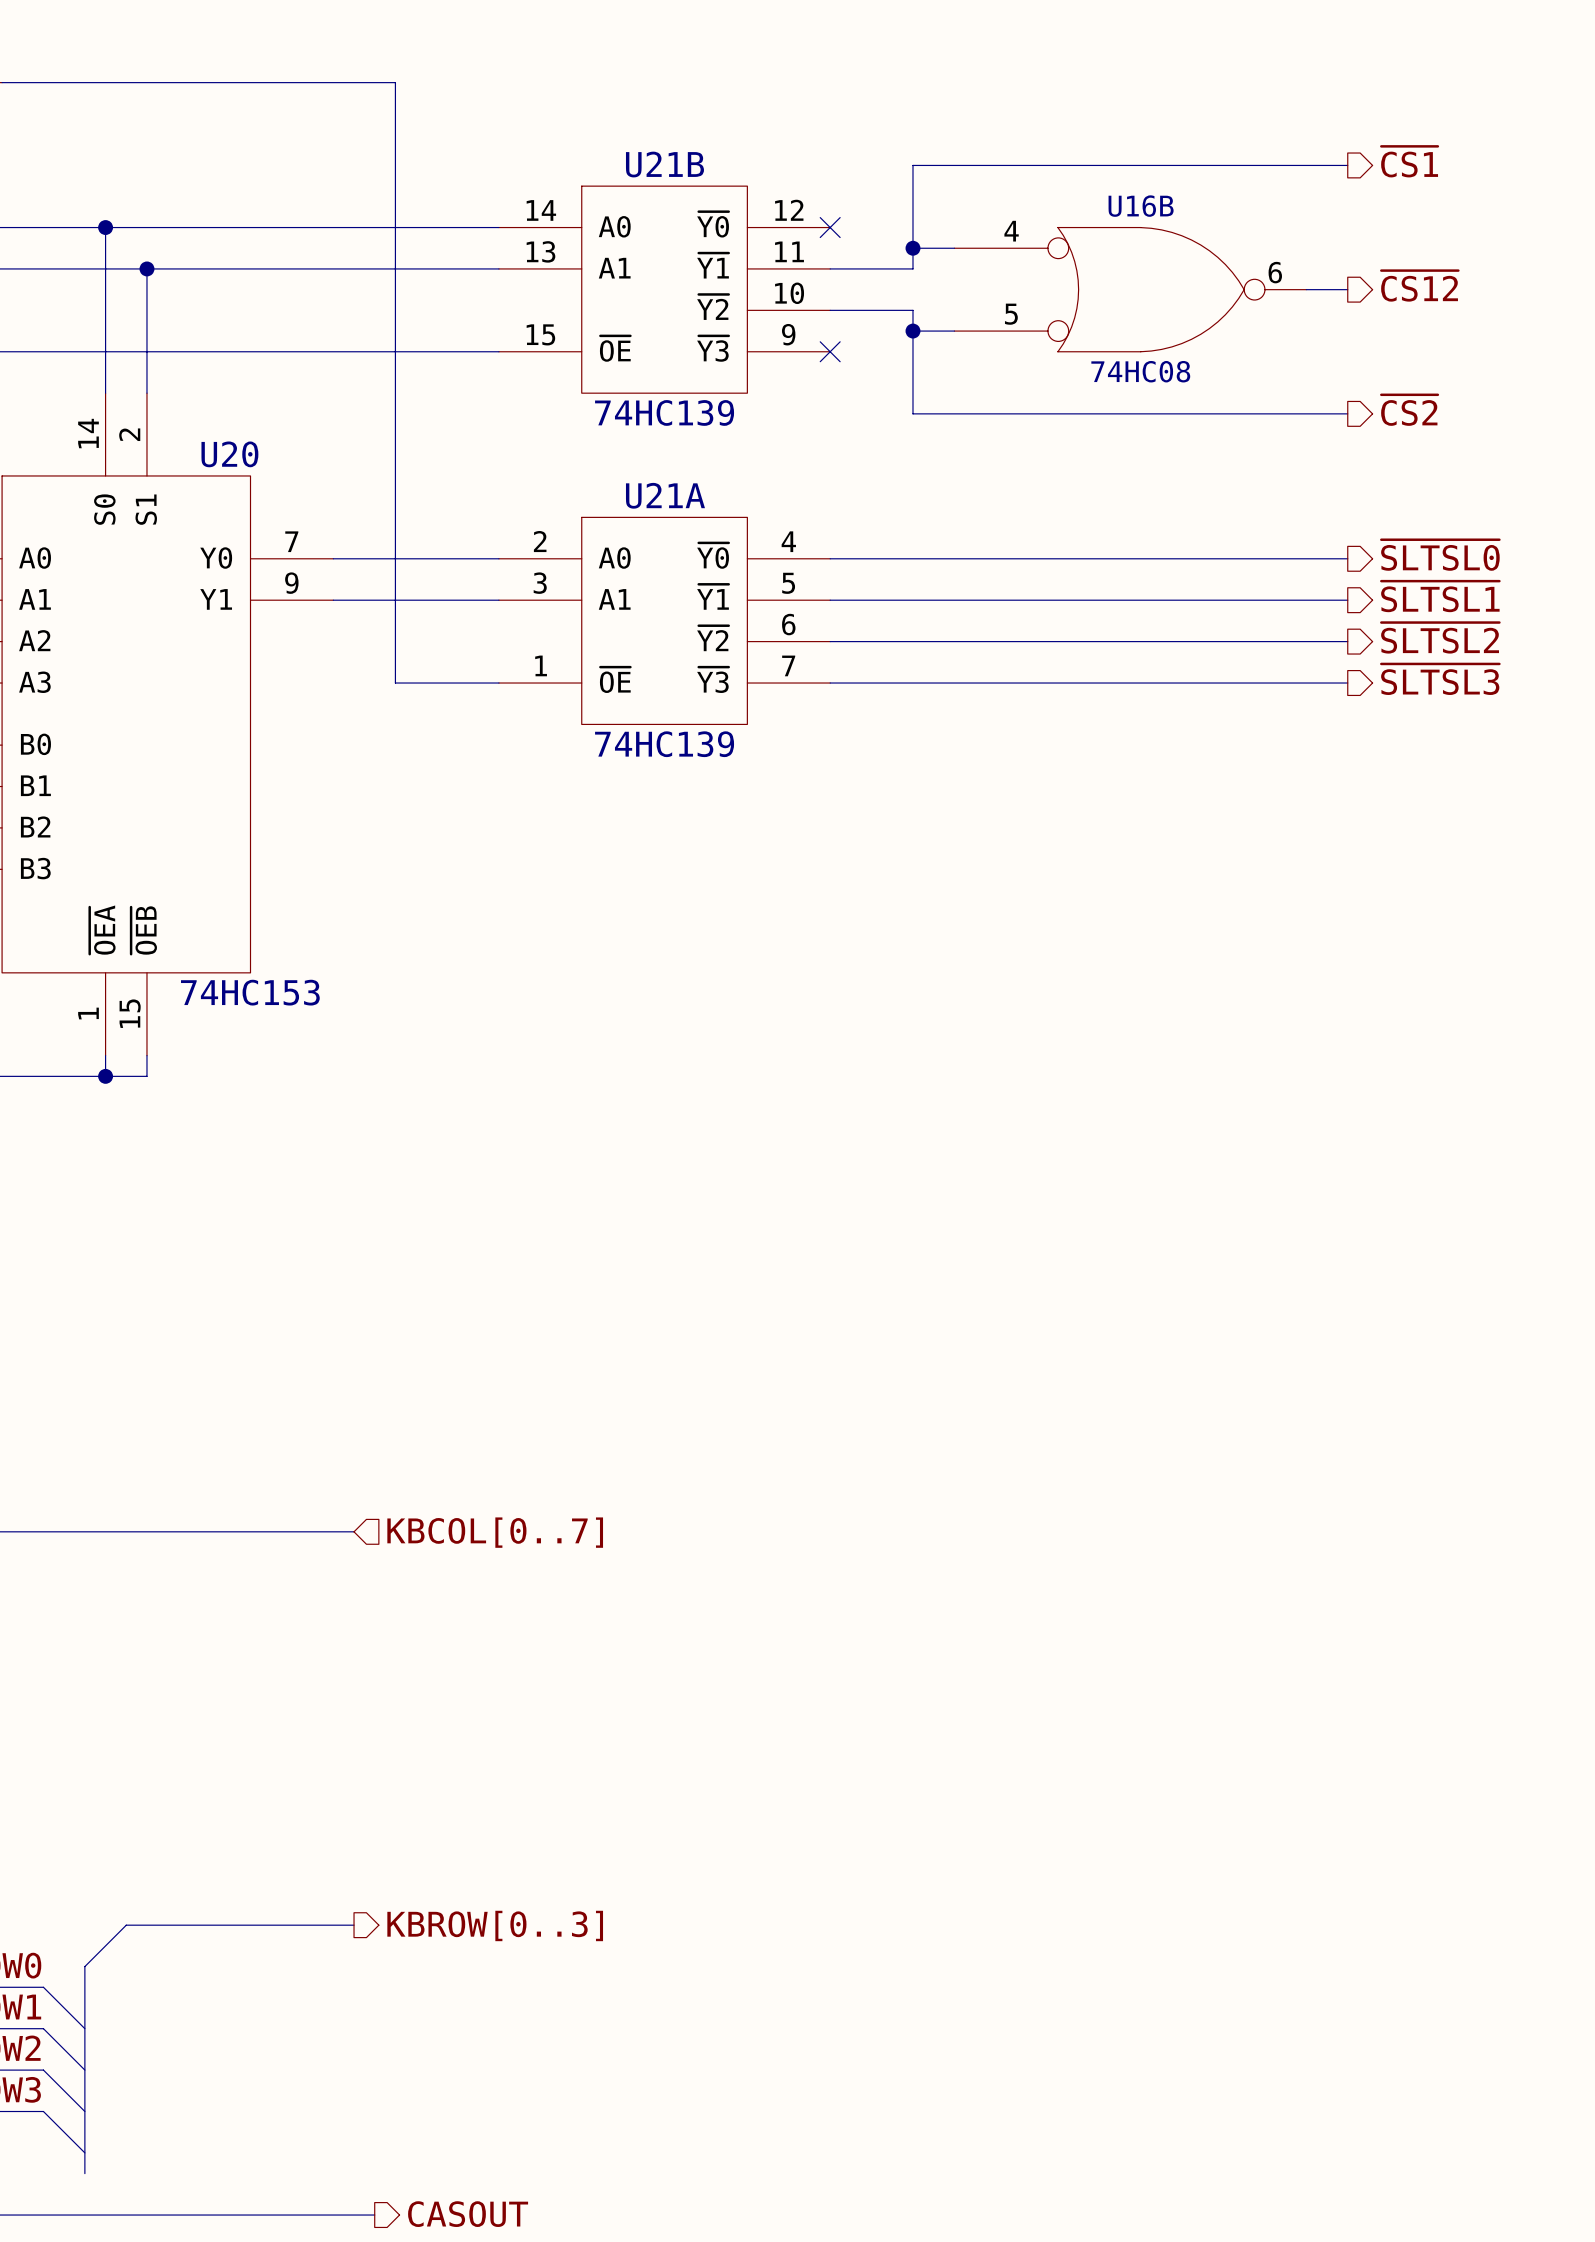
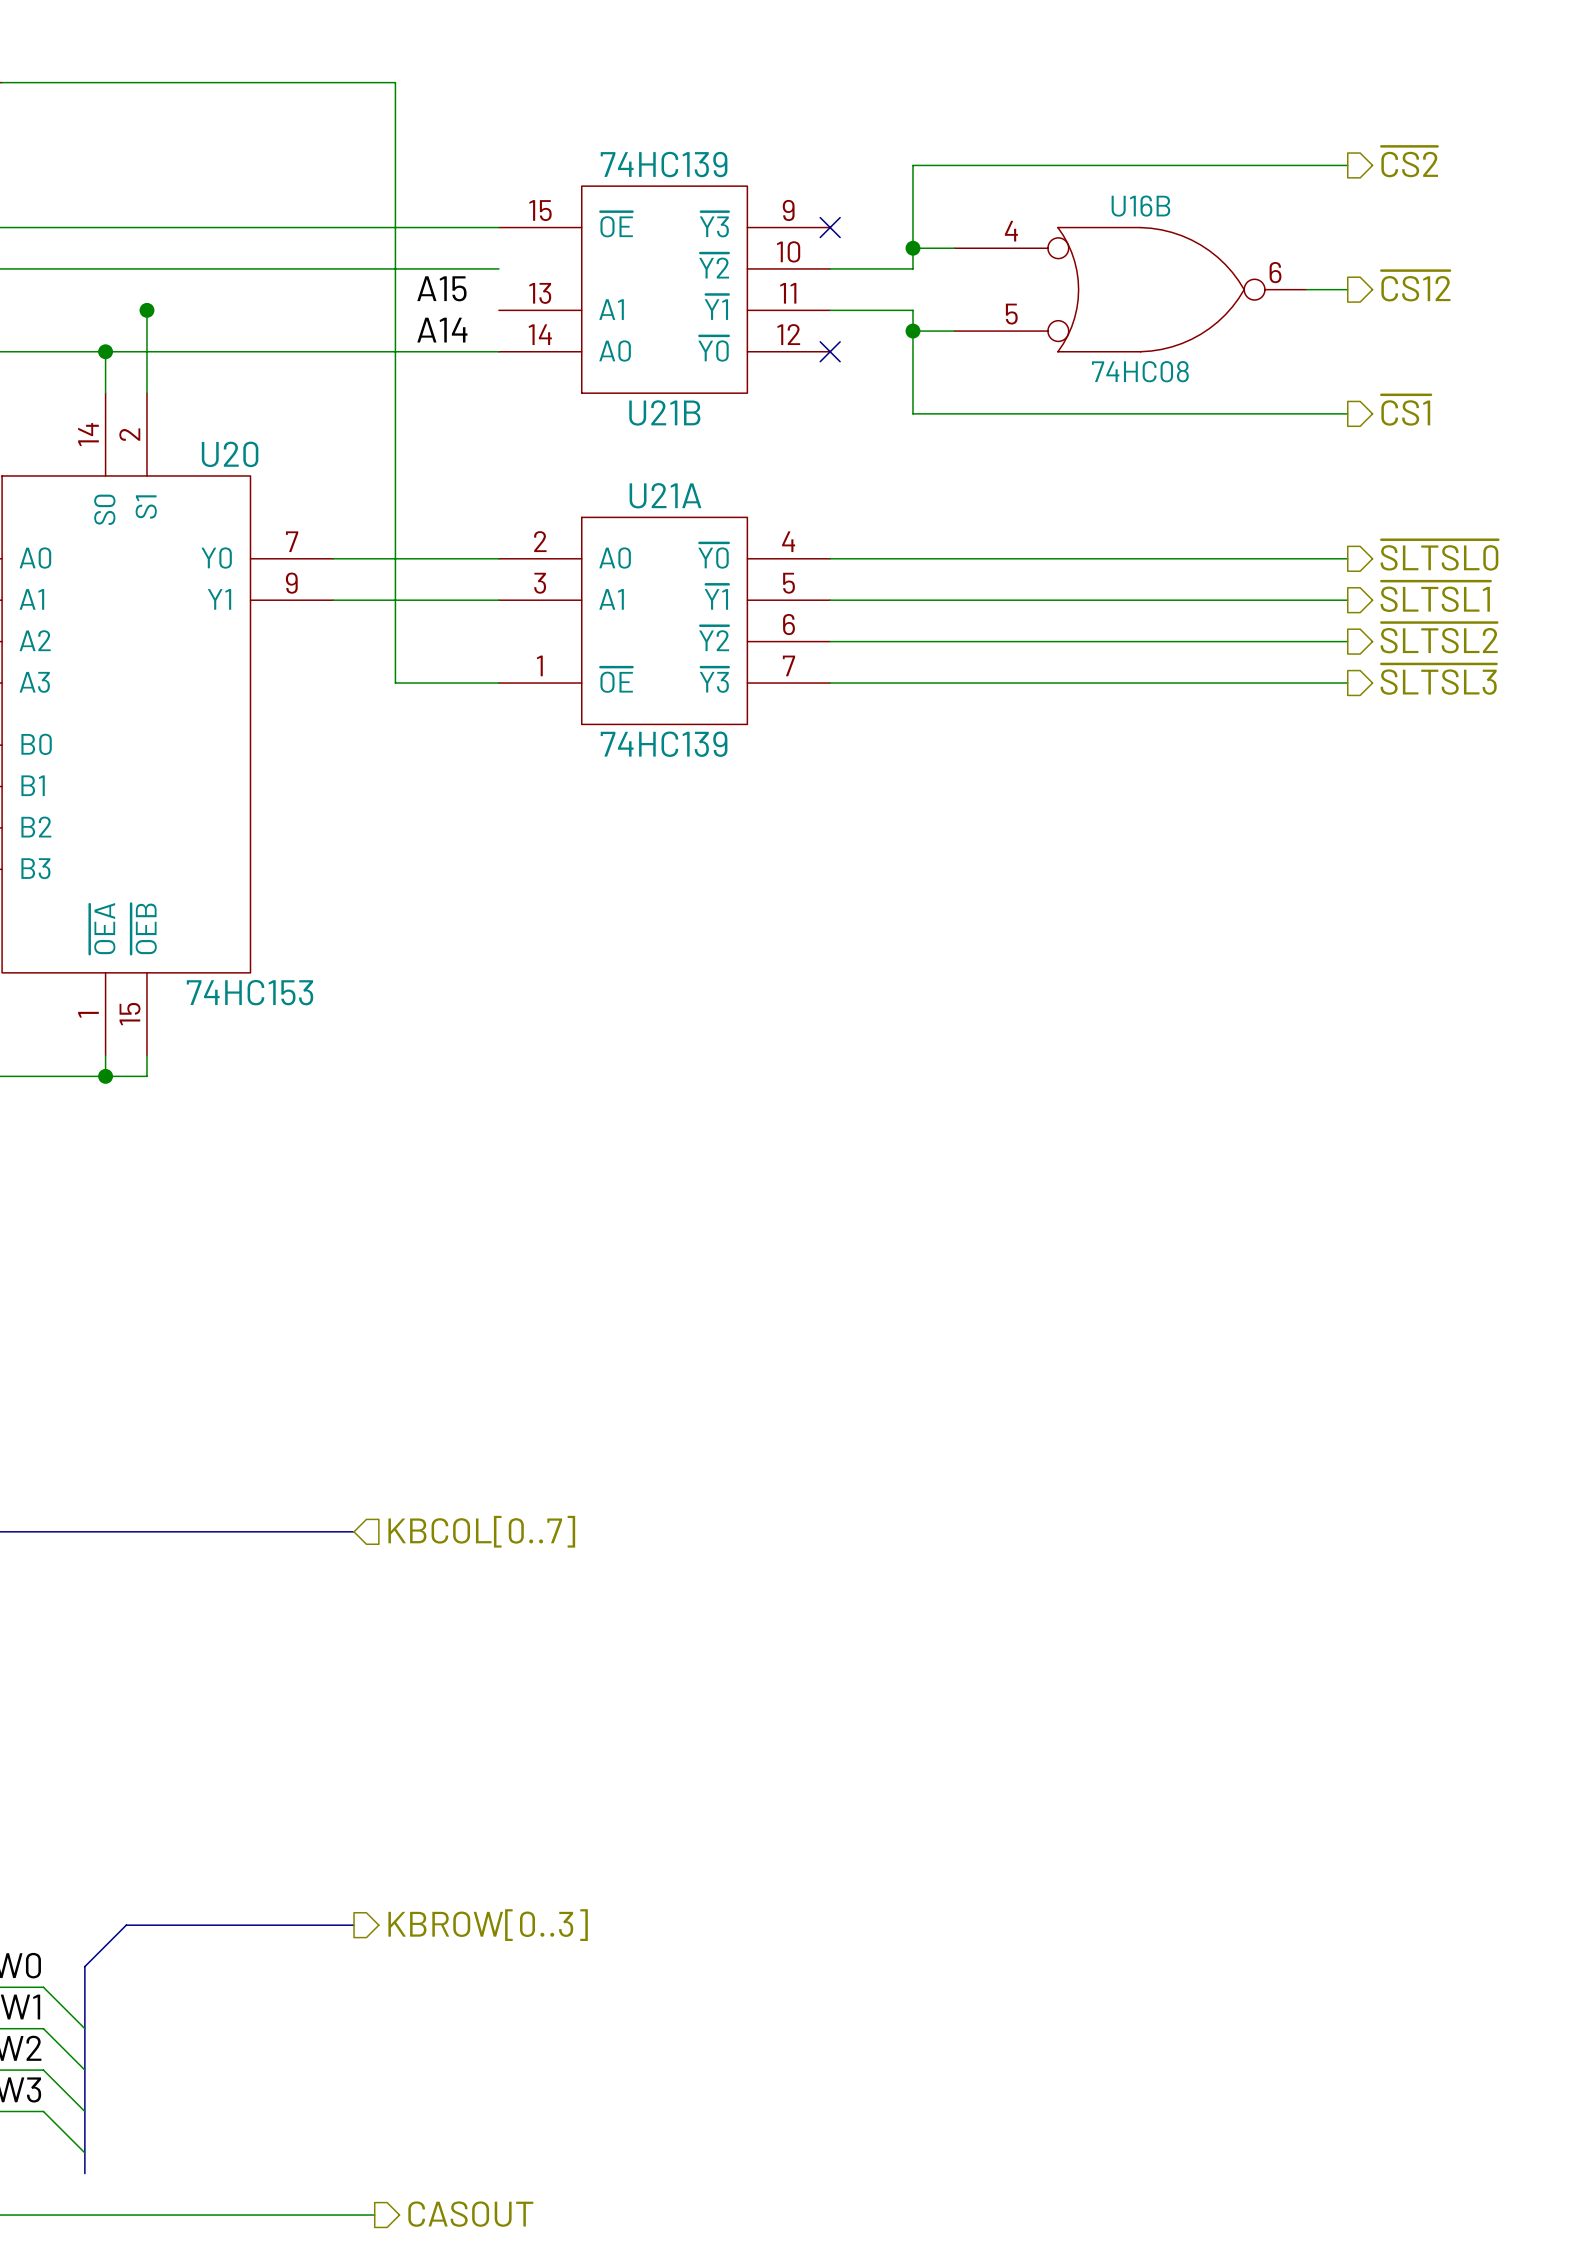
hierarchical label: ~{CS1} (1409, 161) -> ~{CS2} (1409, 161)
wire: (105, 227) (105, 351) -> none
junction: (105, 227) -> none
wire: (146, 268) (146, 310) -> none
junction position: (146, 268) -> (146, 310)
label: none -> A15 (441, 288)
U21B flip: as is (664, 289) -> up-down (664, 289)
label: none -> A14 (442, 330)
junction: none -> (105, 351)
hierarchical label: ~{CS2} (1409, 410) -> ~{CS1} (1406, 410)

